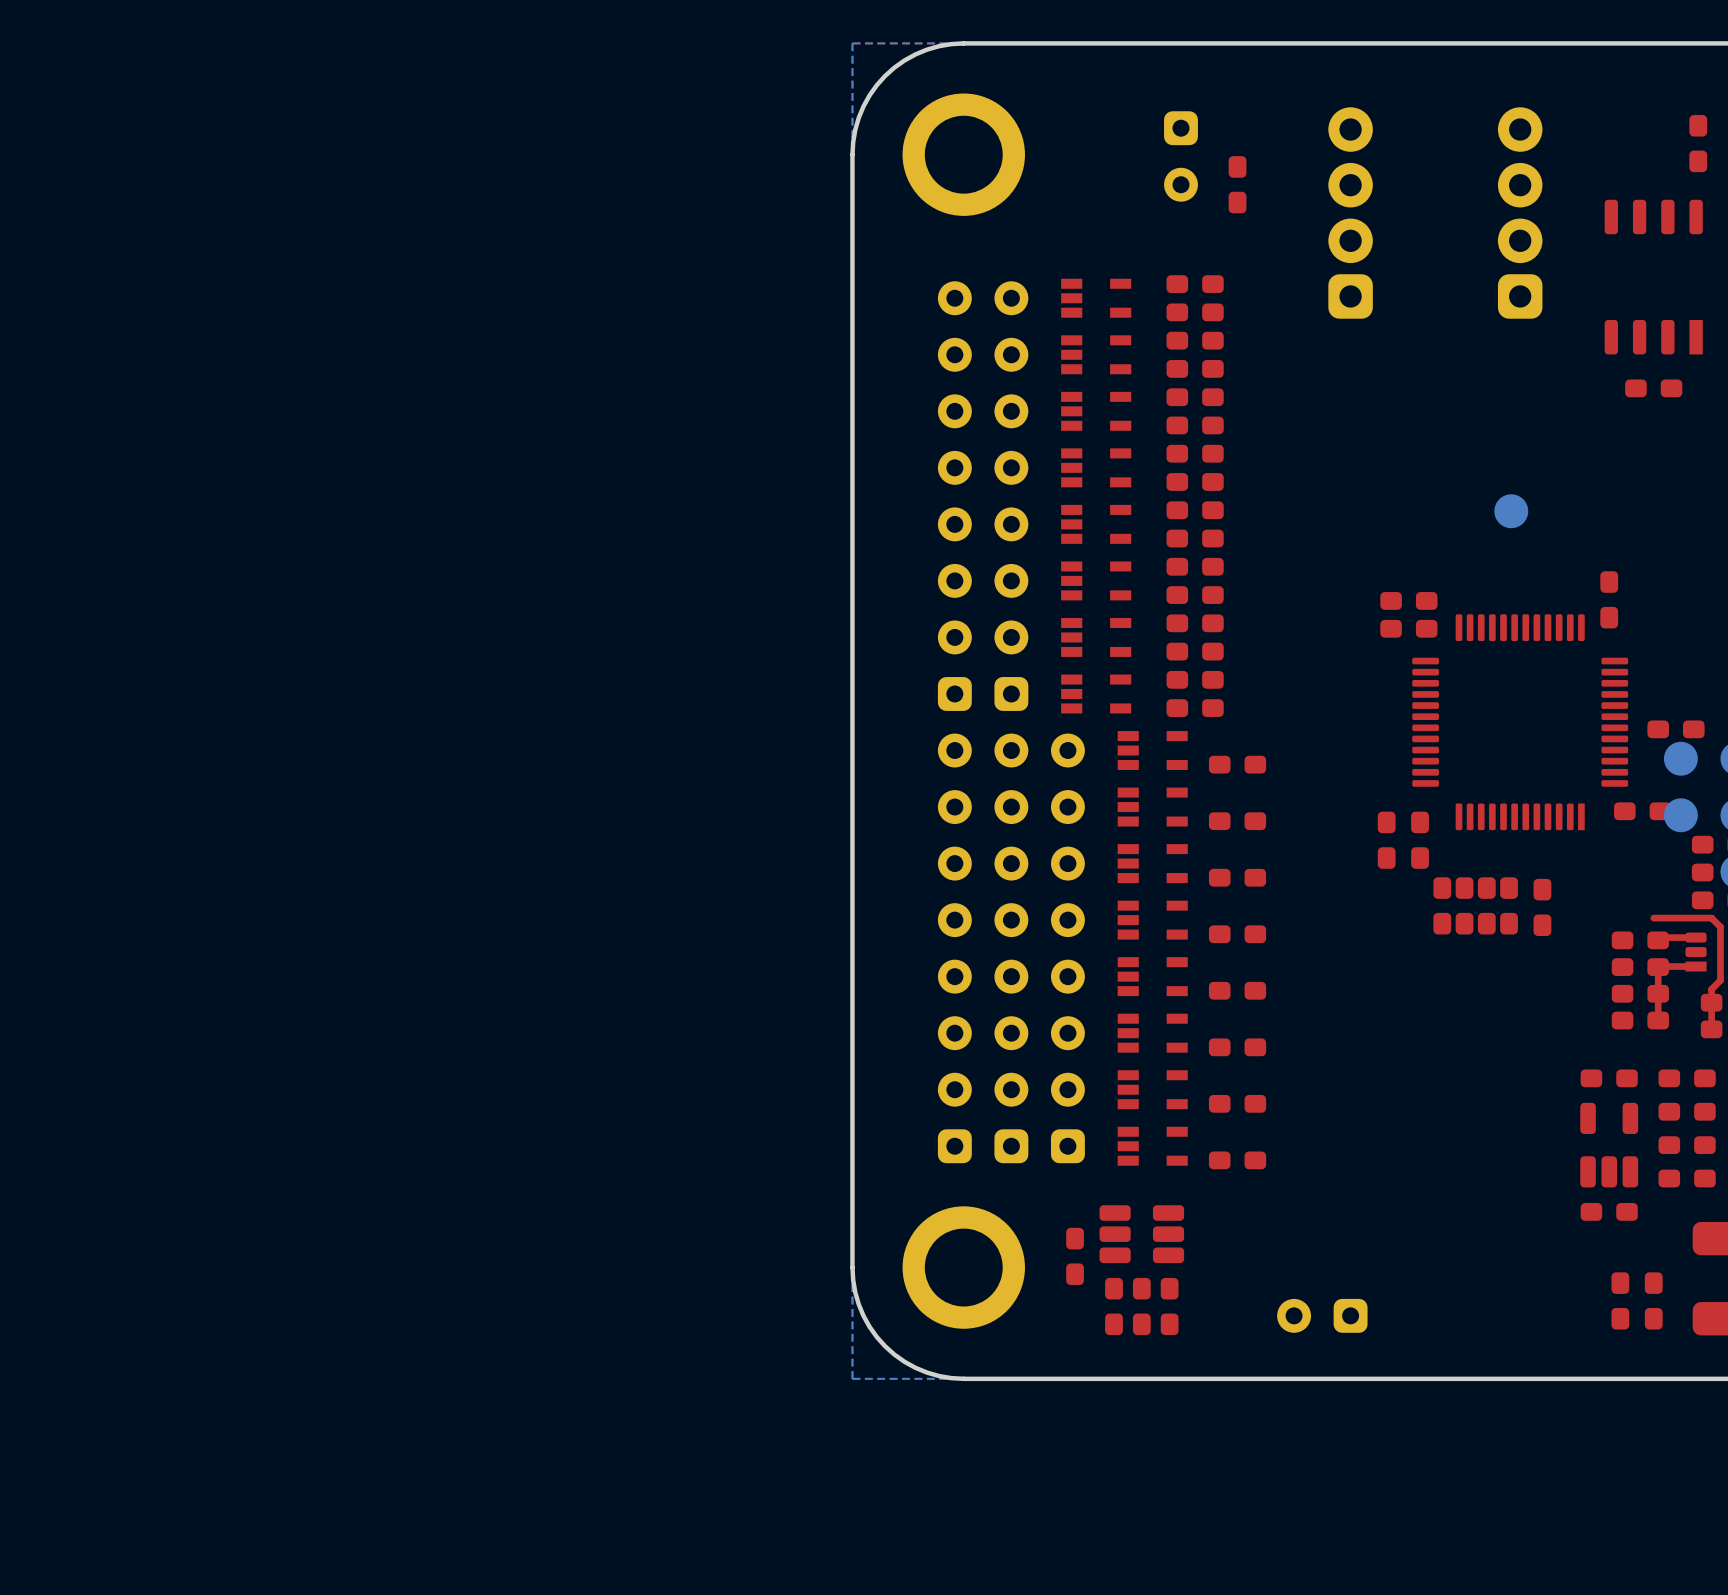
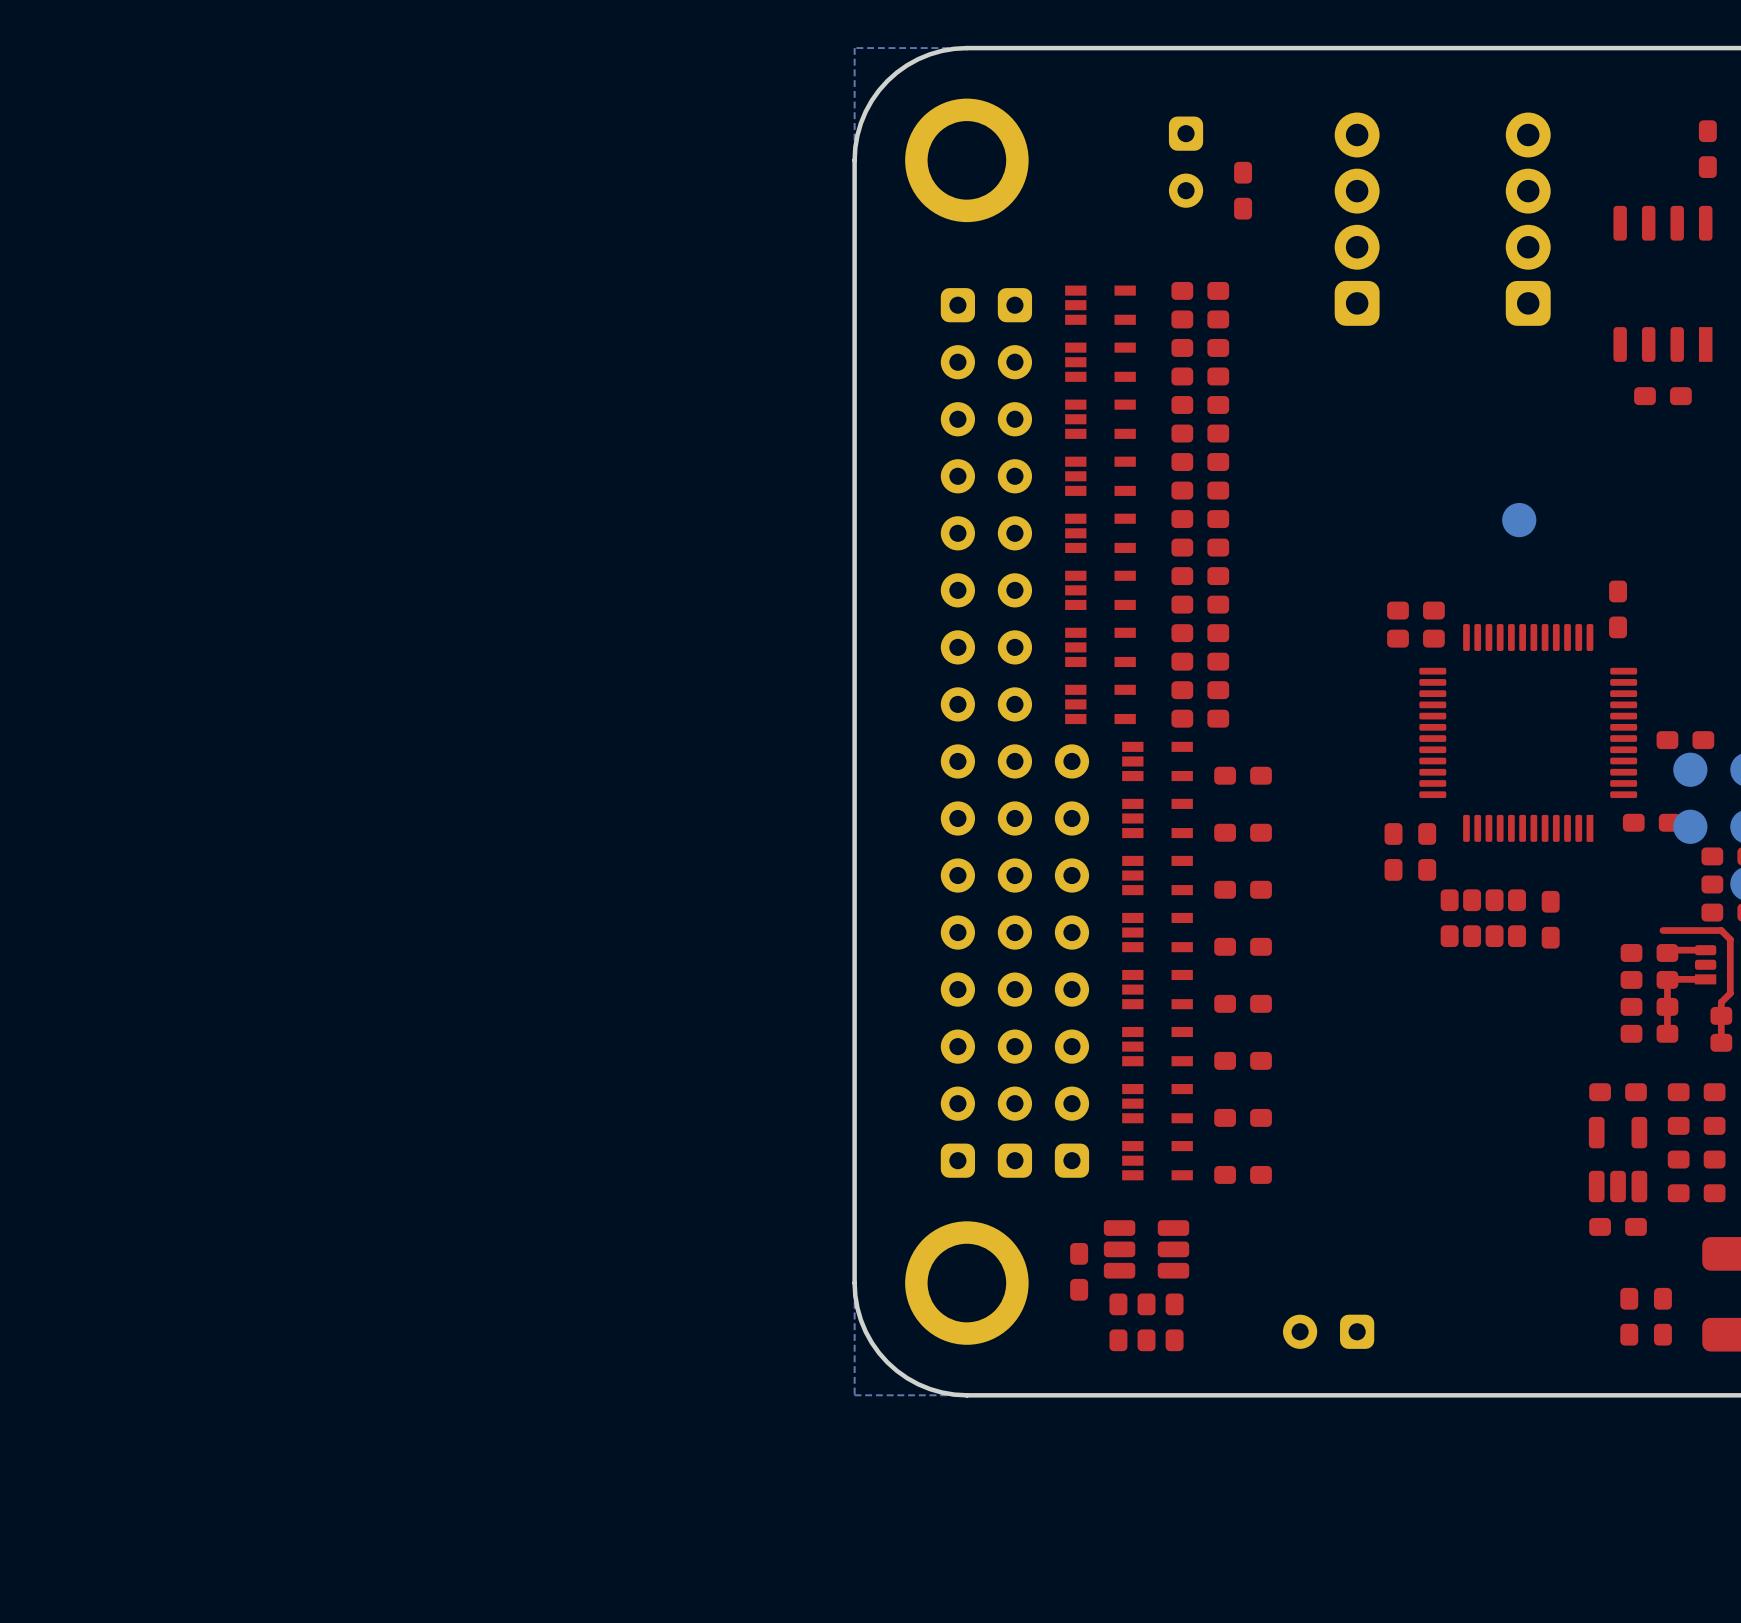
part rotation: 0° (954, 496) -> 180° (957, 504)
part rotation: 0° (1011, 496) -> 180° (1014, 504)

